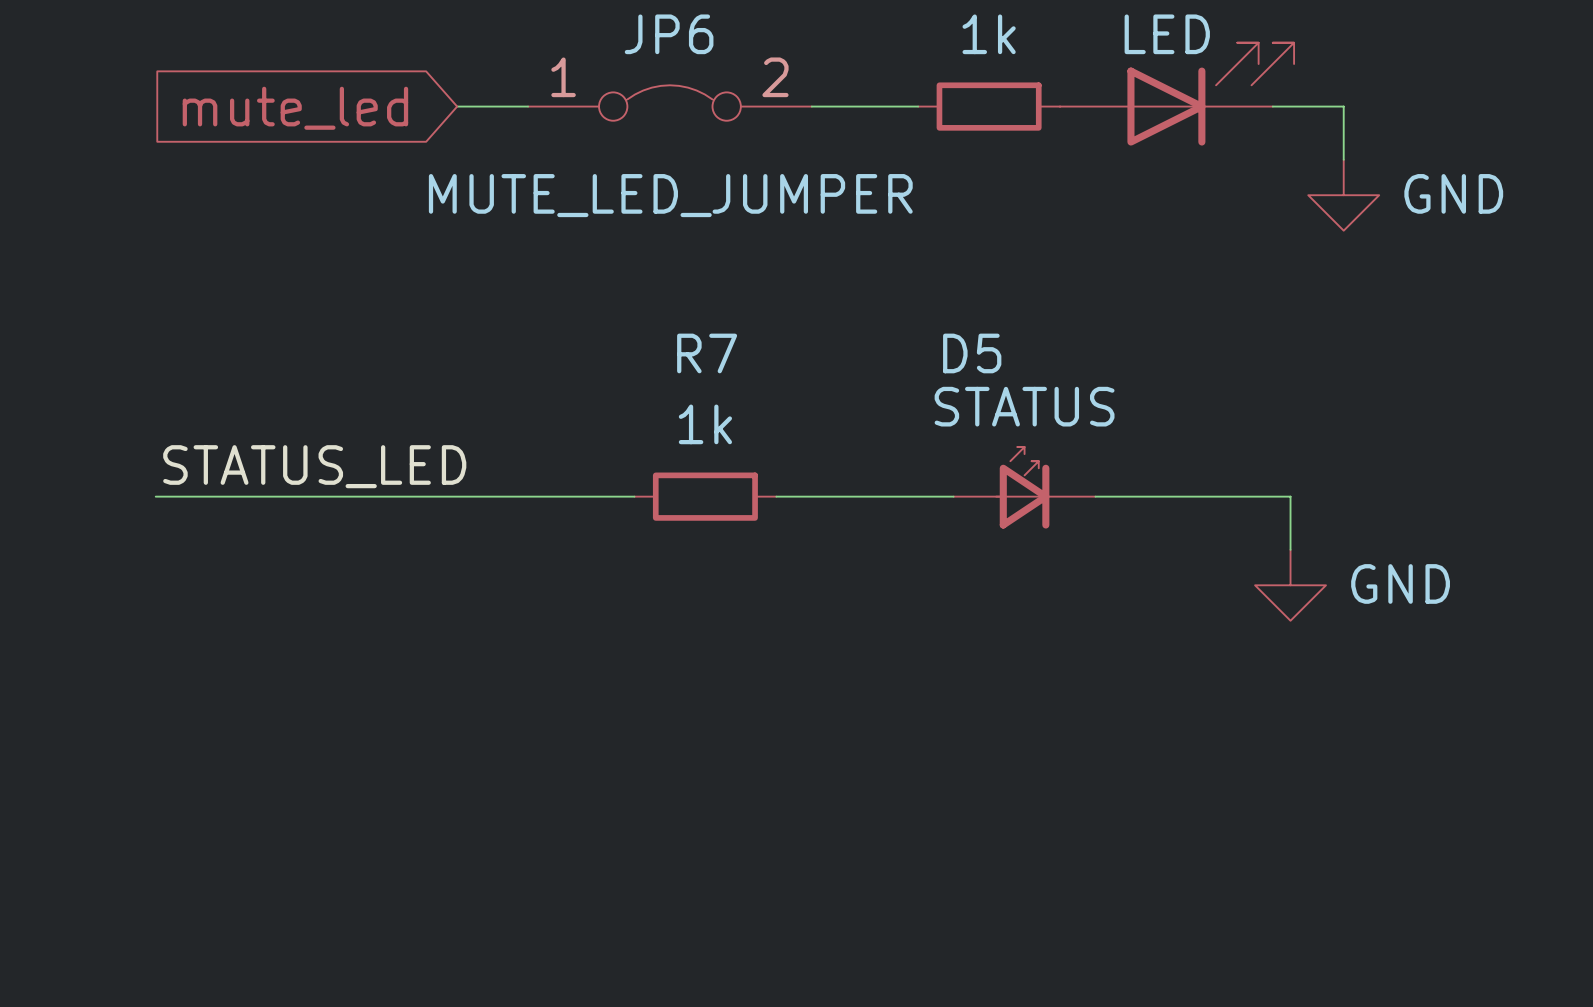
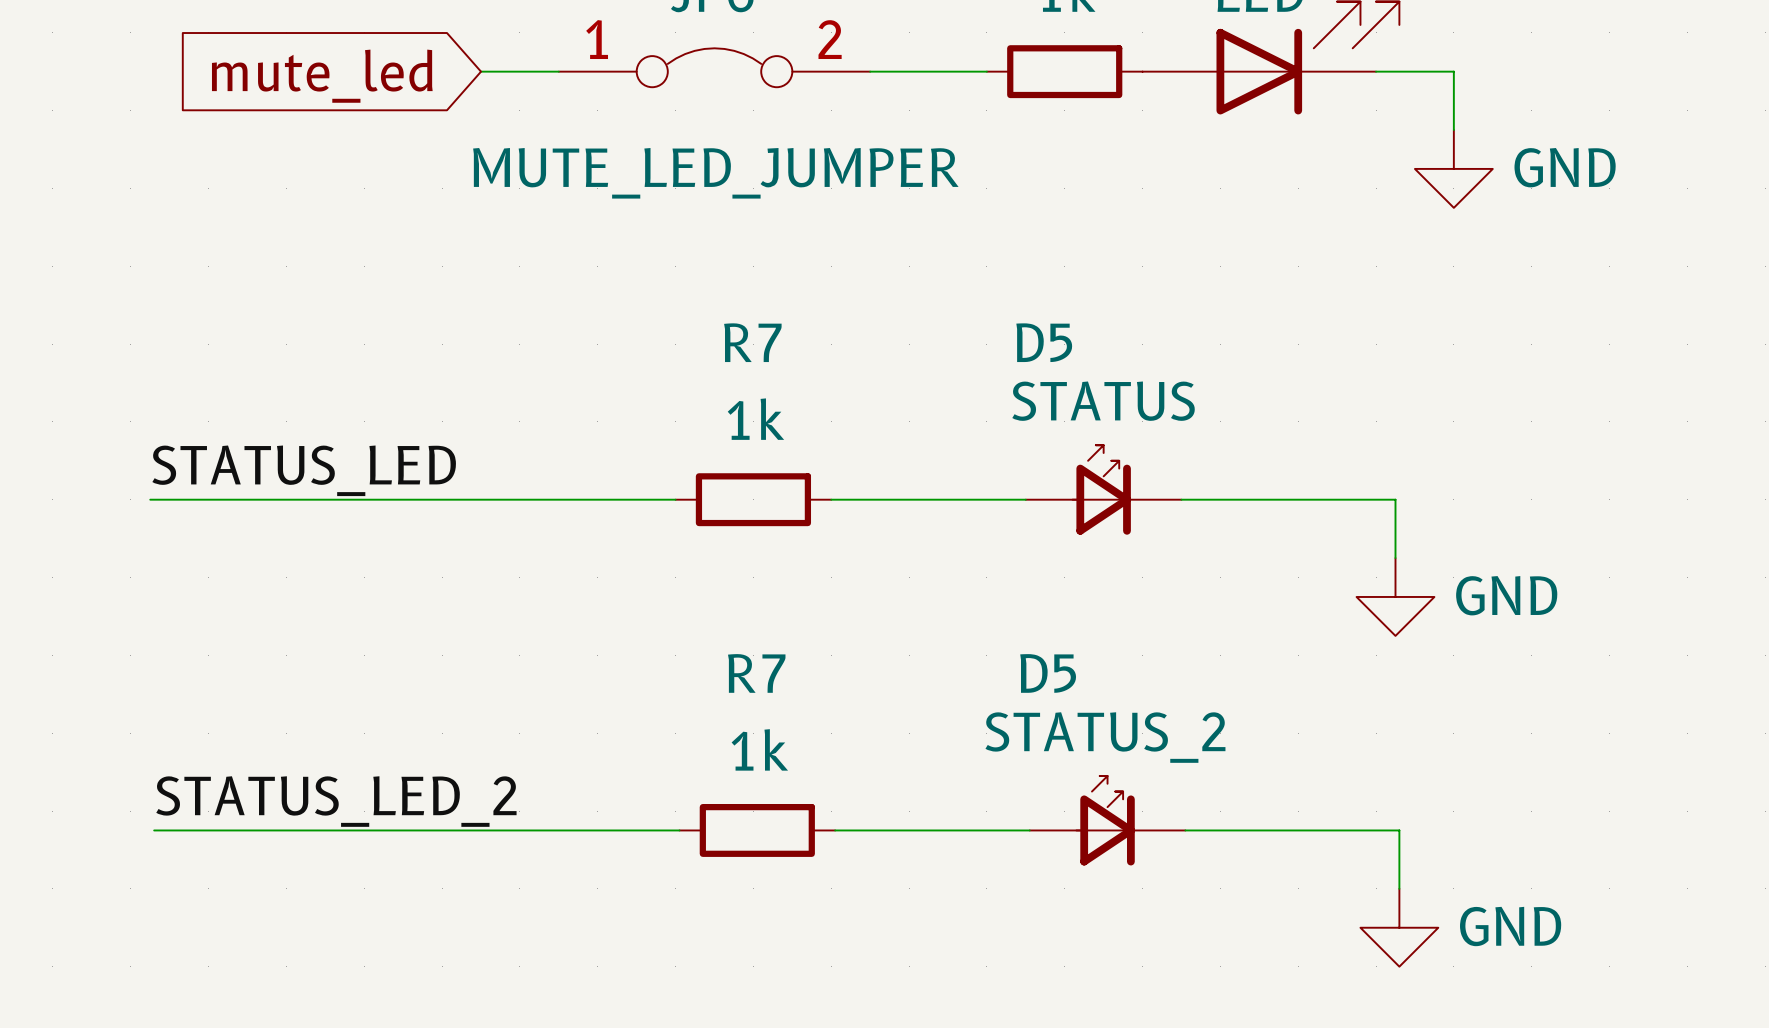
label: none -> STATUS_LED_2 (336, 801)
D5: none -> STATUS_2 (1107, 820)
wire: none -> (154, 830) (679, 830)
R7: none -> 1k (757, 830)
wire: none -> (835, 830) (1029, 830)
wire: none -> (1185, 830) (1399, 830) (1399, 888)
power symbol: none -> GND (1399, 927)

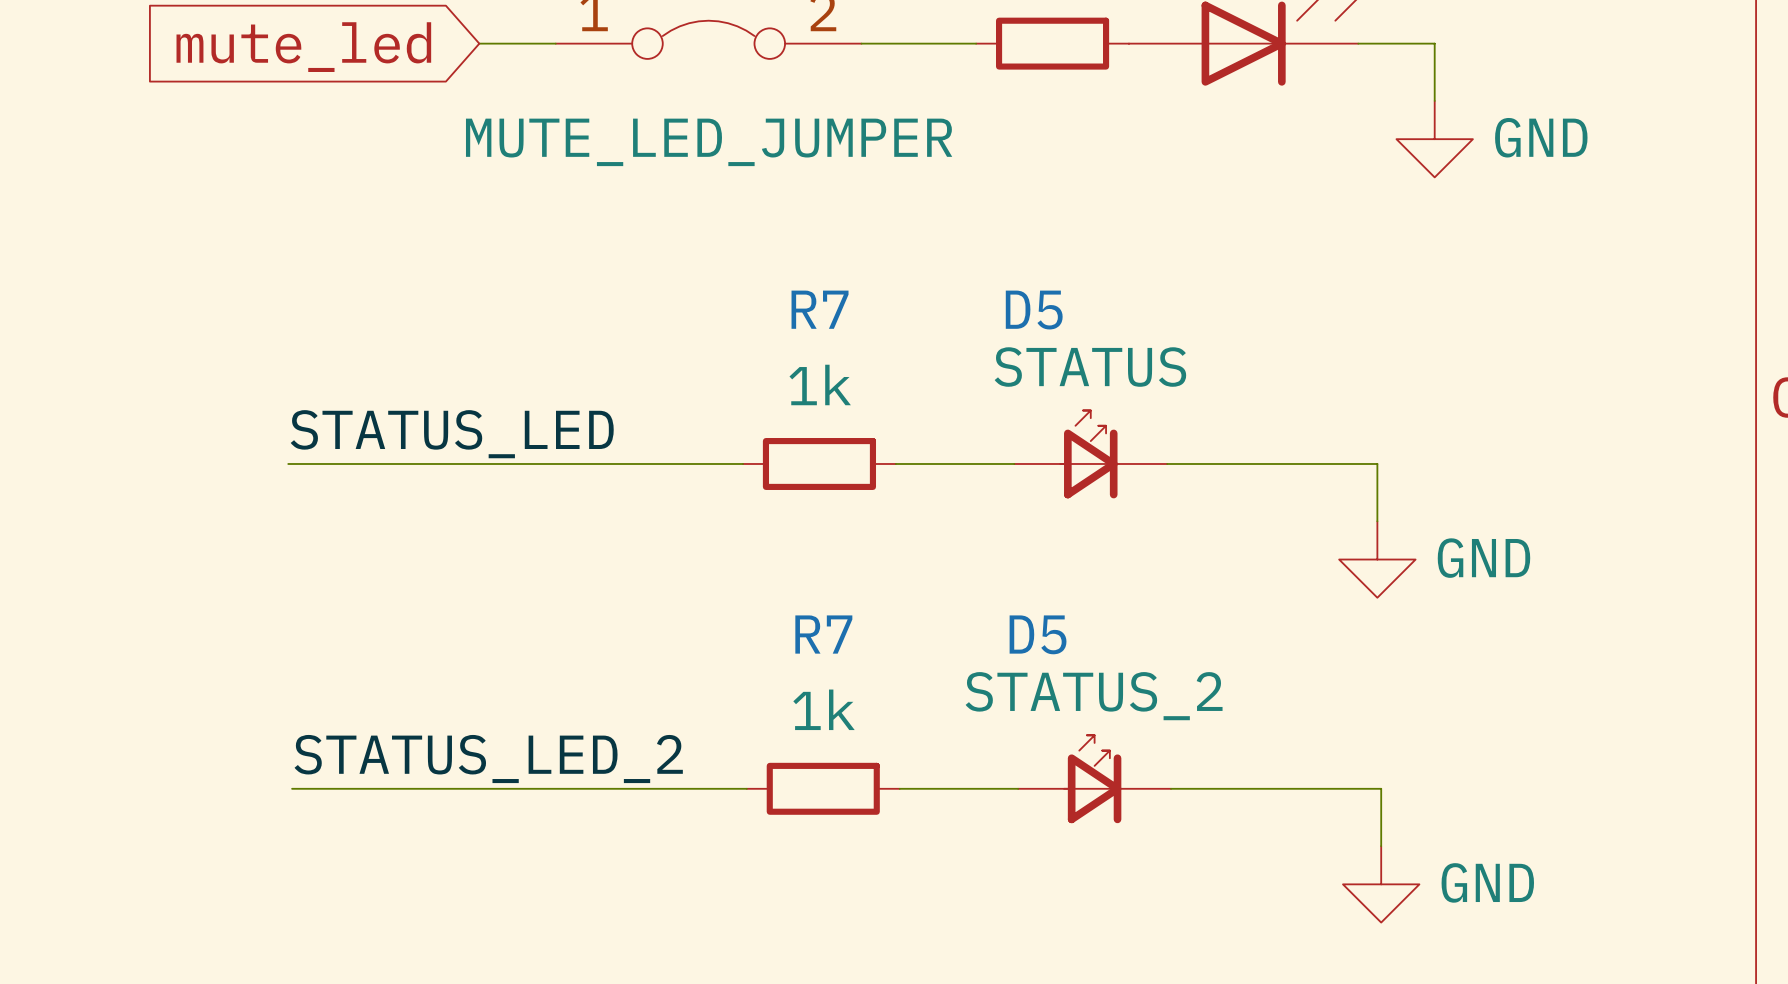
label position: STATUS_LED (304, 470) -> STATUS_LED (452, 434)
wire: (150, 499) (286, 499) -> none
R7 position: (753, 499) -> (819, 463)
wire: (831, 499) (905, 499) -> (670, 463) (743, 463)
label position: STATUS_LED_2 (336, 801) -> STATUS_LED_2 (488, 759)
wire: (154, 830) (290, 830) -> none
R7 position: (757, 830) -> (823, 788)
wire: (835, 830) (909, 830) -> (674, 788) (746, 788)

